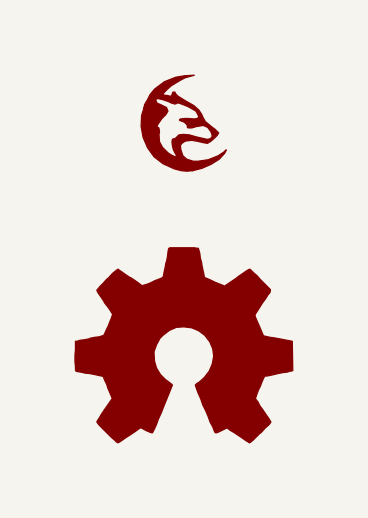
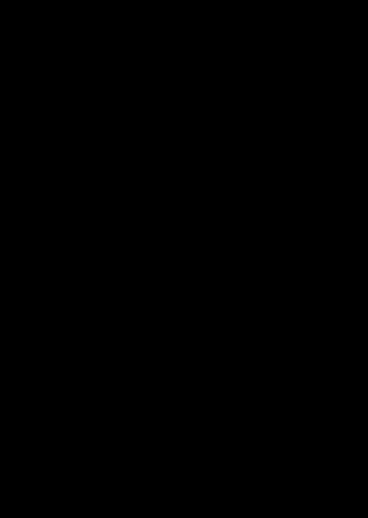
part: (183, 123) -> none
part: (183, 345) -> none

